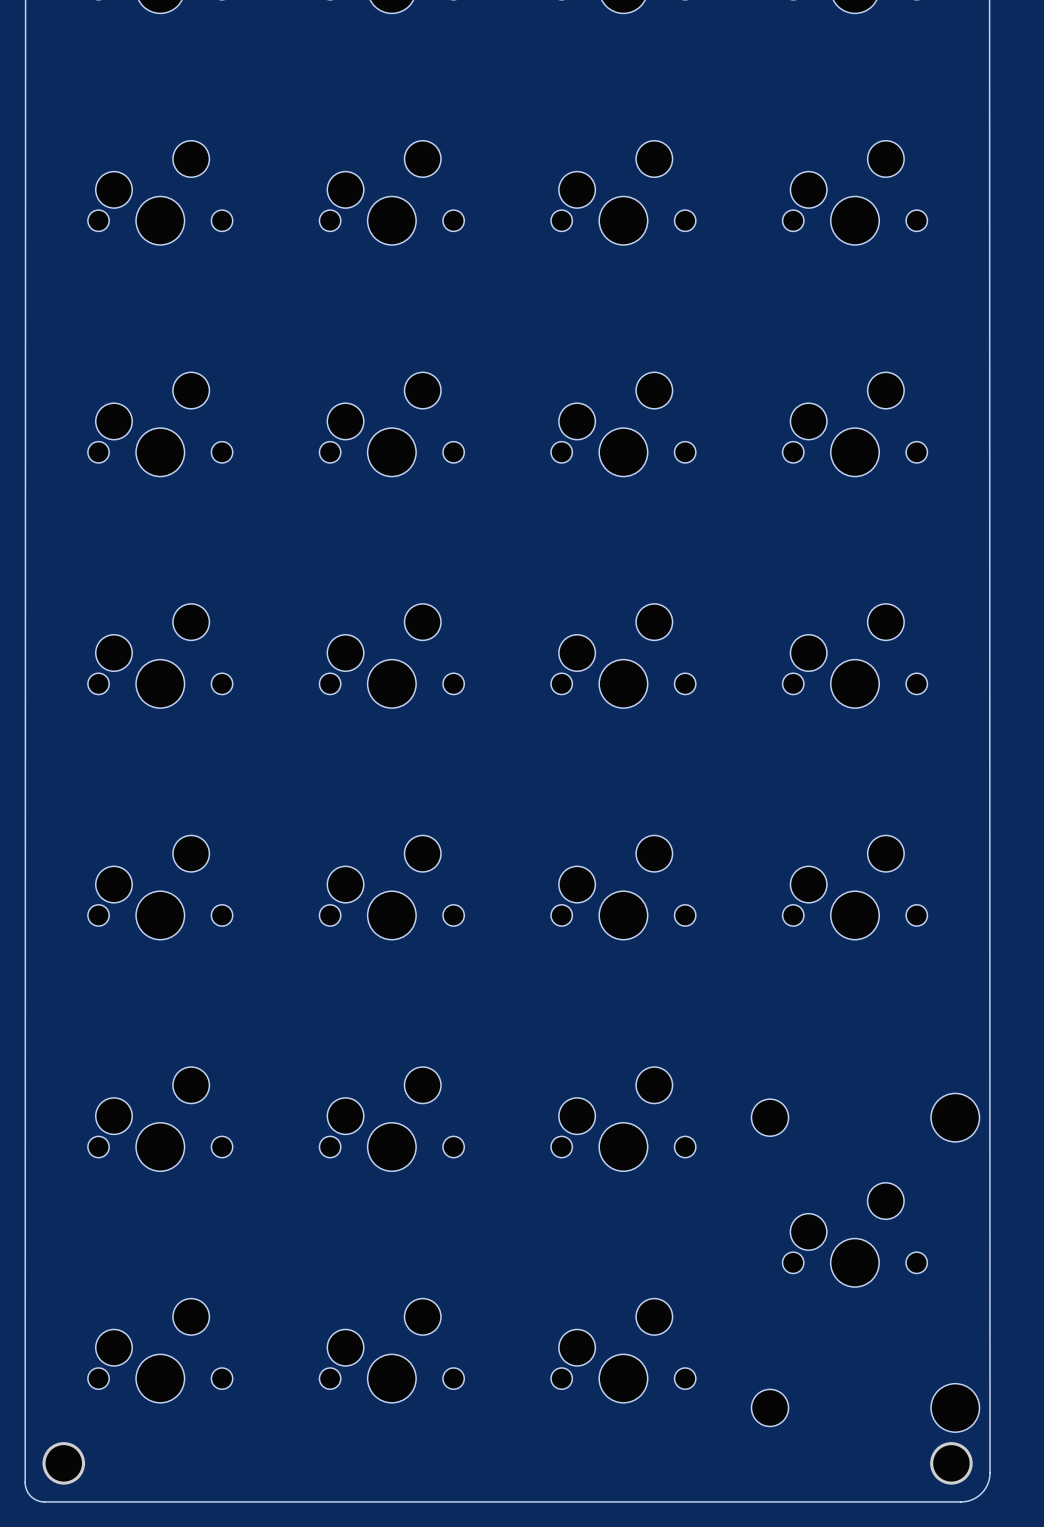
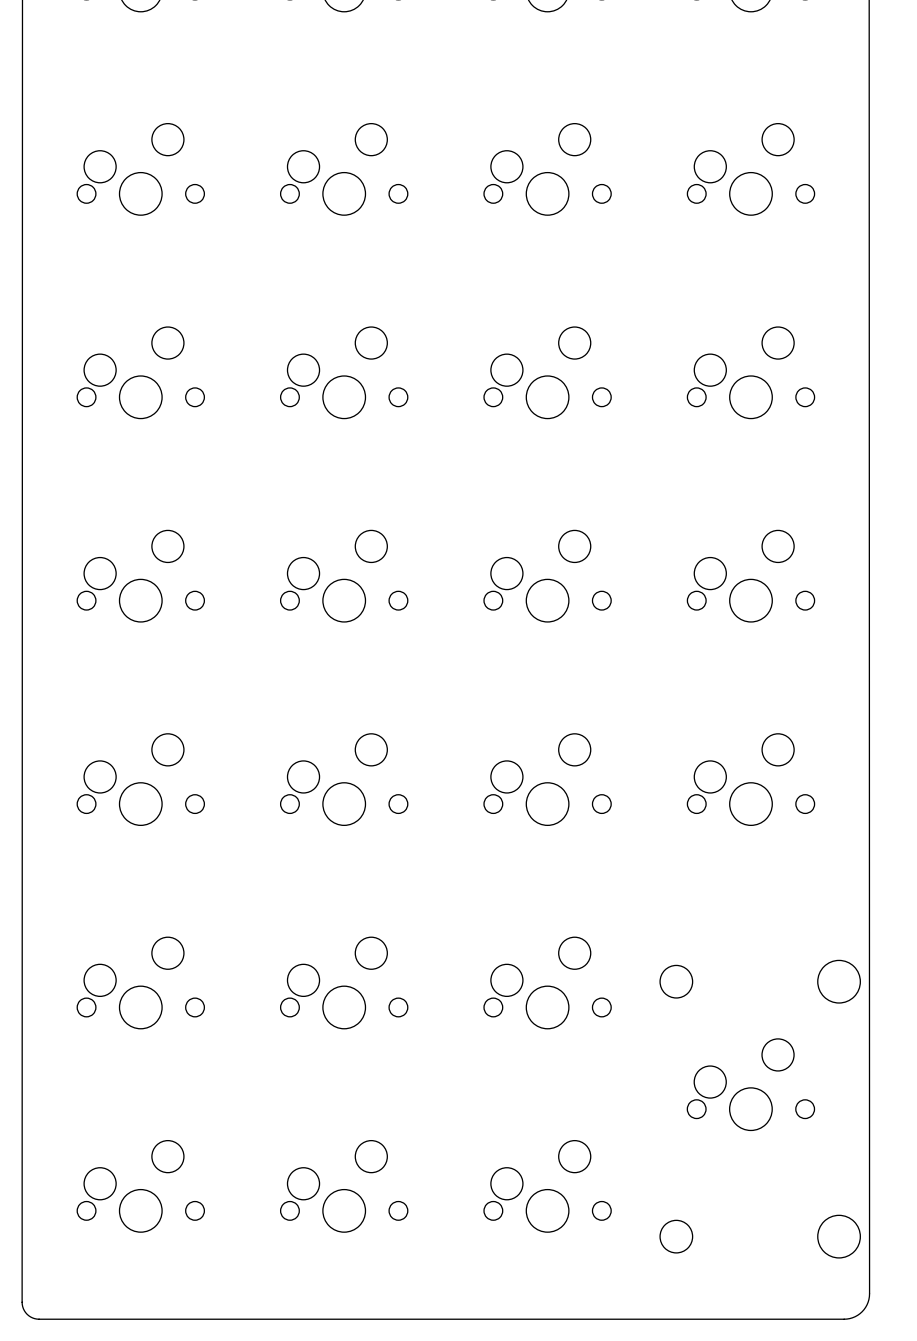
part: (63, 1463) -> none
part: (951, 1463) -> none

